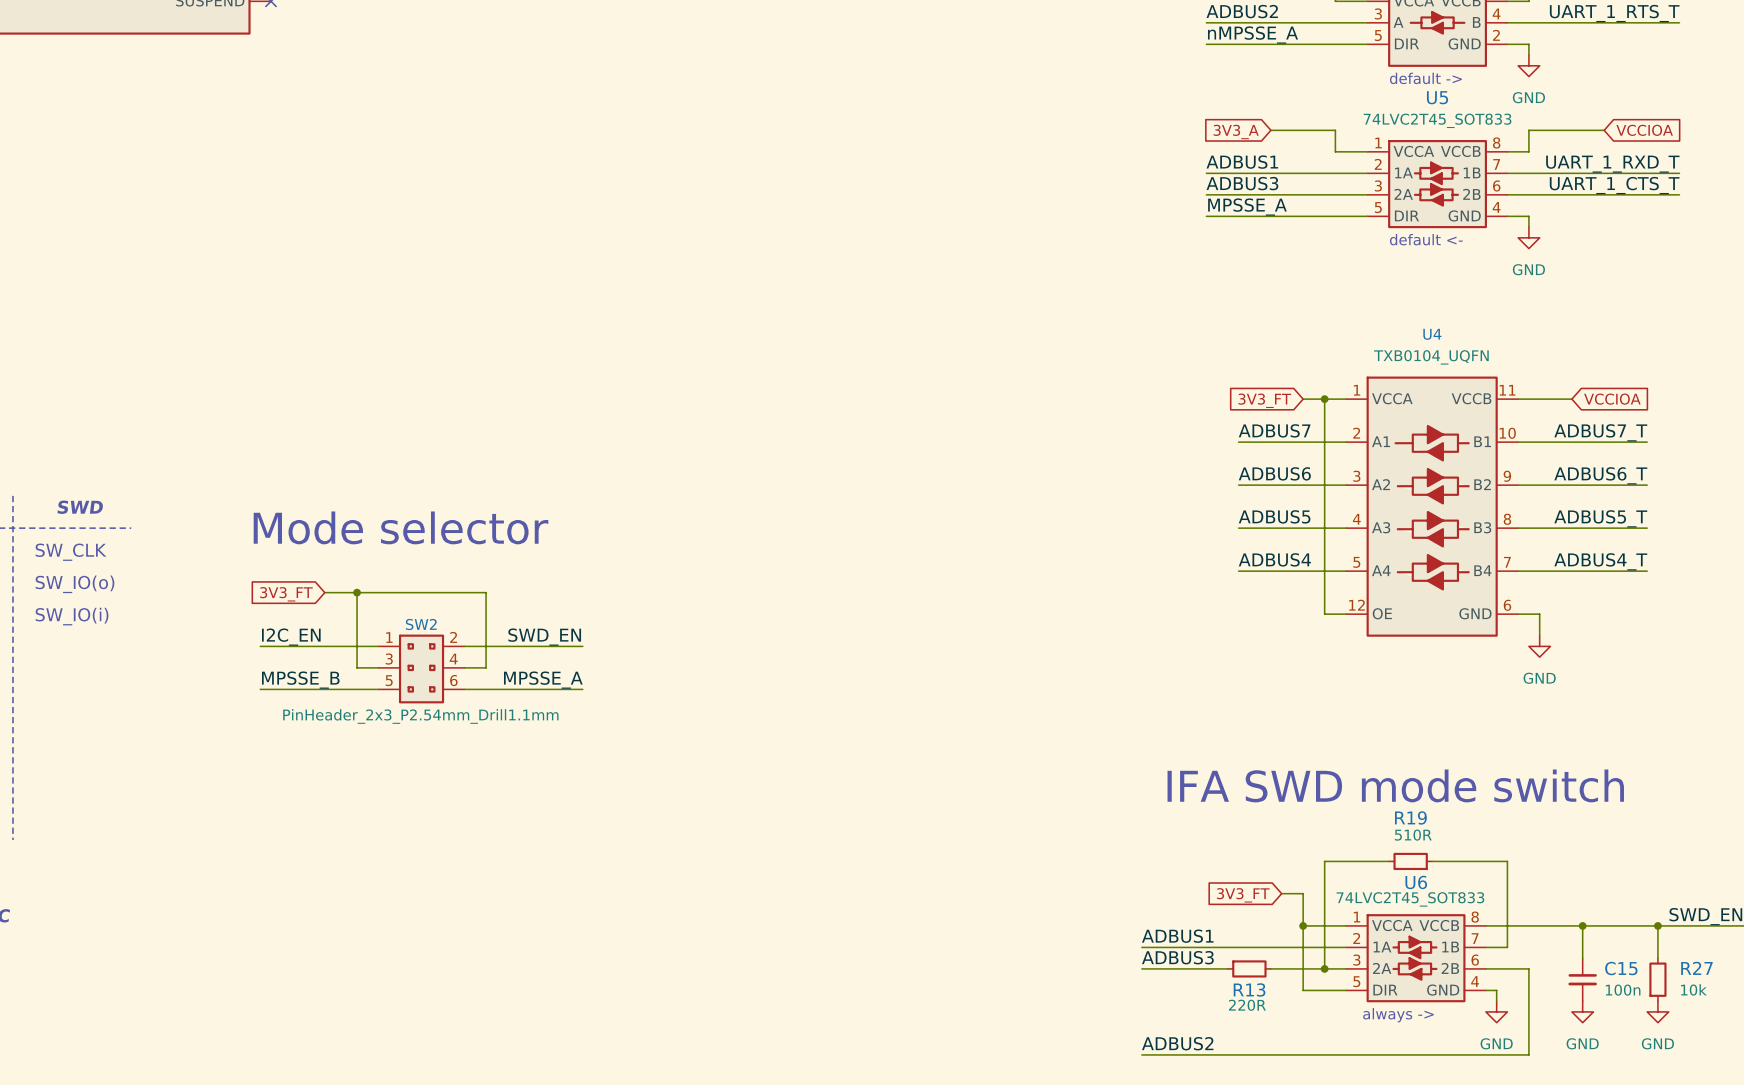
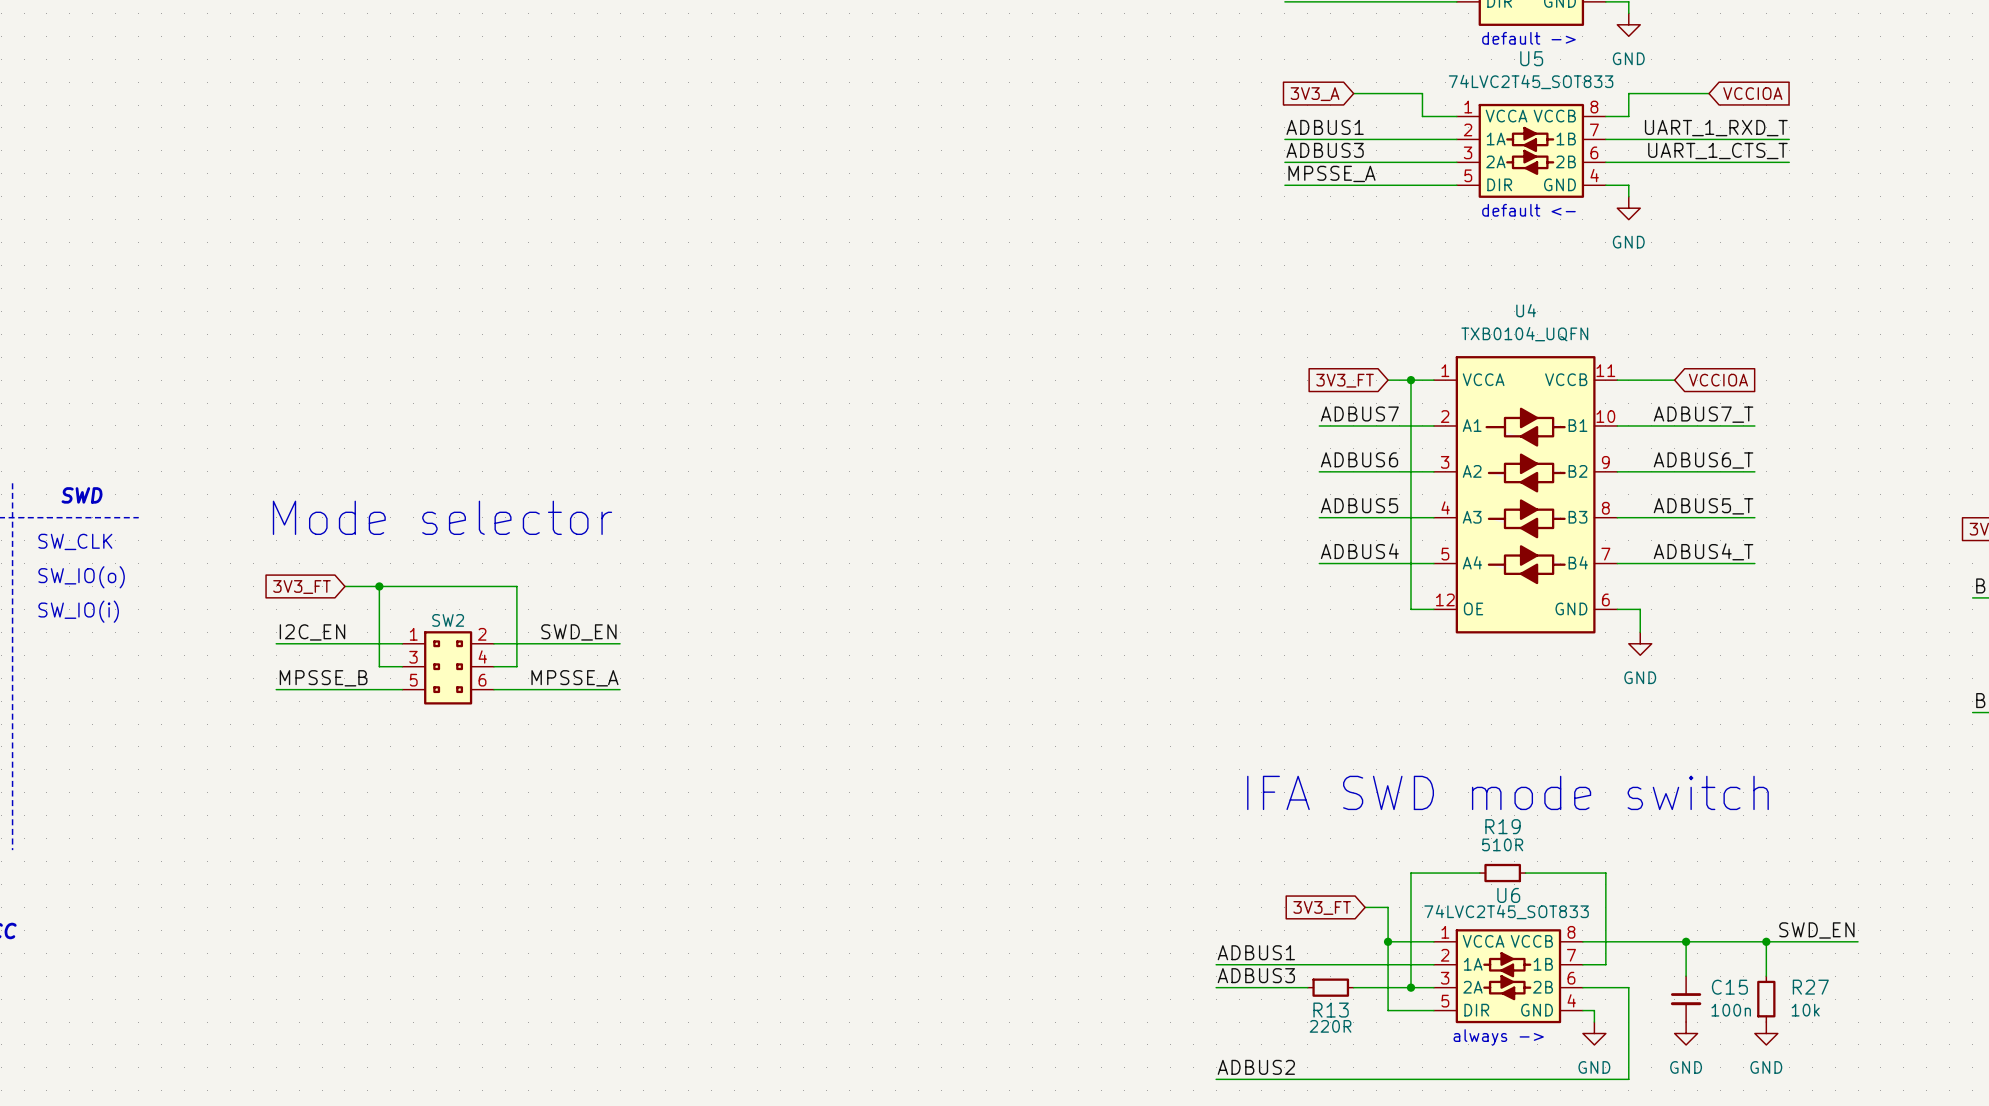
SW2 value: PinHeader_2x3_P2.54mm_Drill1.1mm (420, 716) -> none

